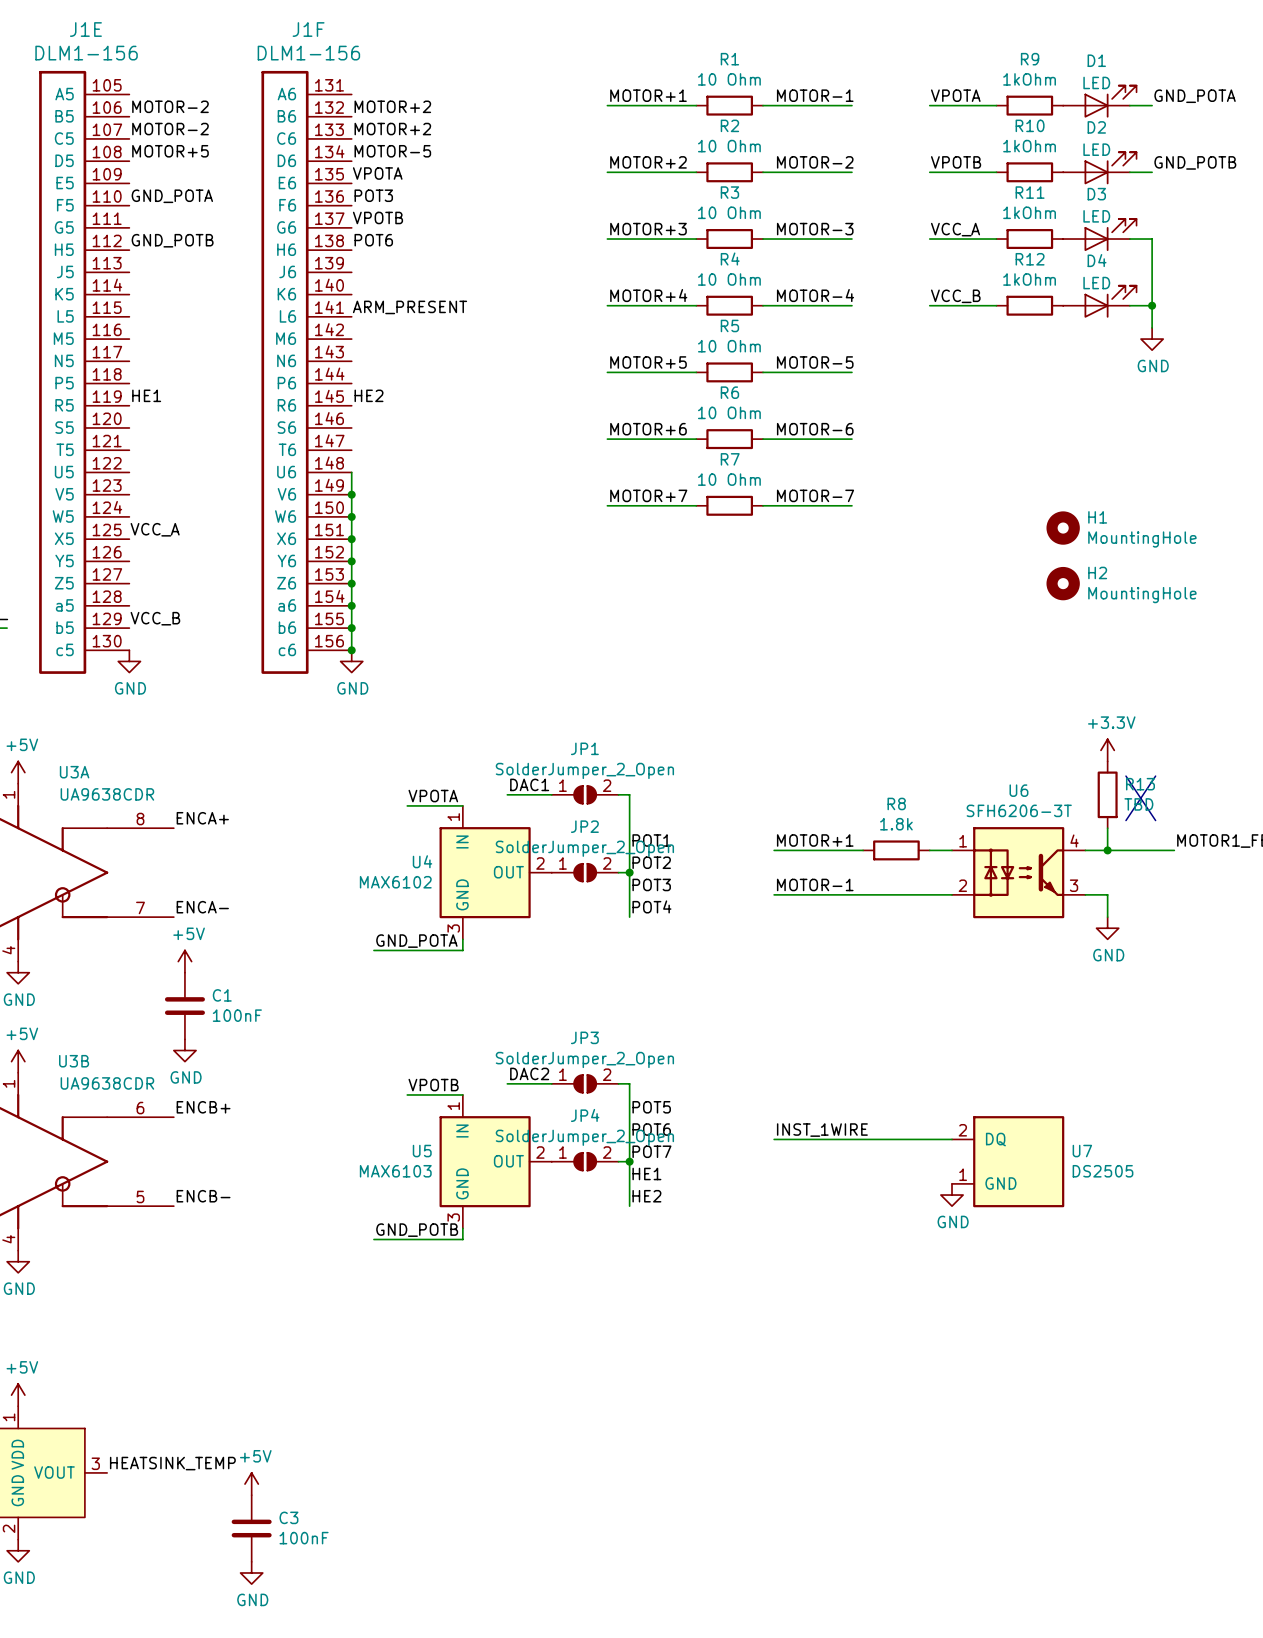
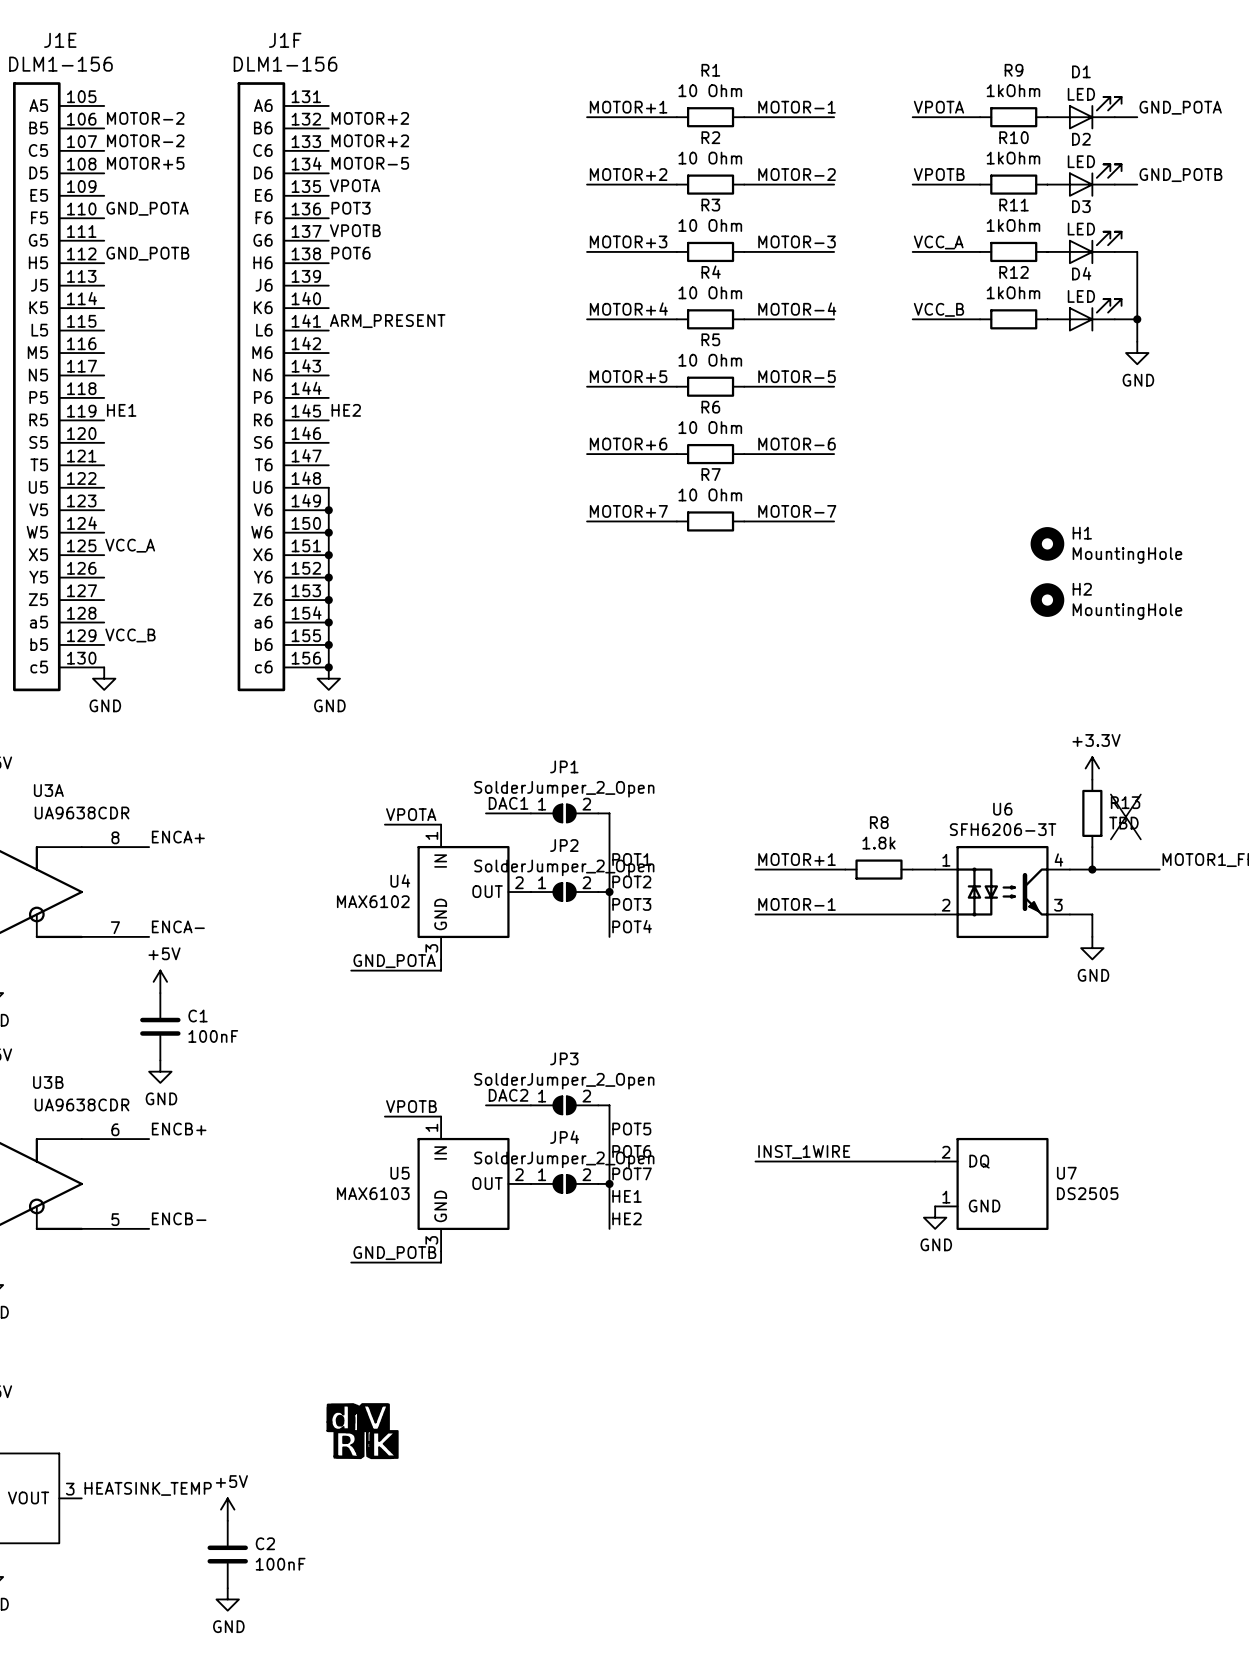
power symbol: none -> (362, 1431)
C3 name: C3 (288, 1517) -> C2 (265, 1543)

